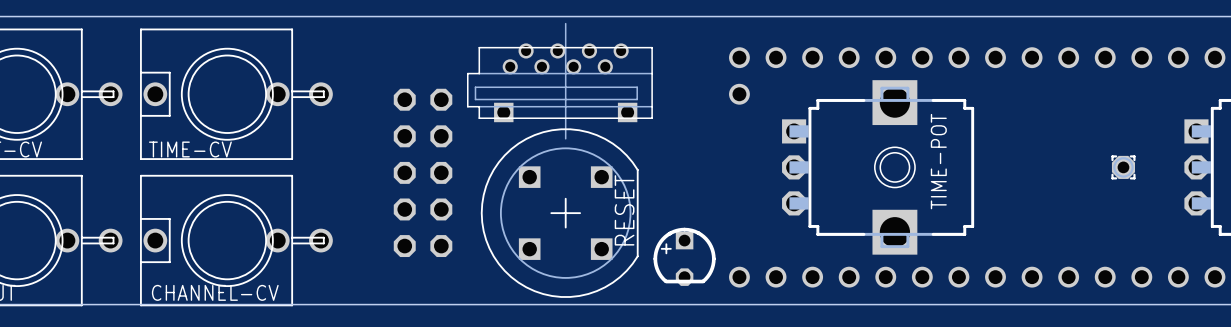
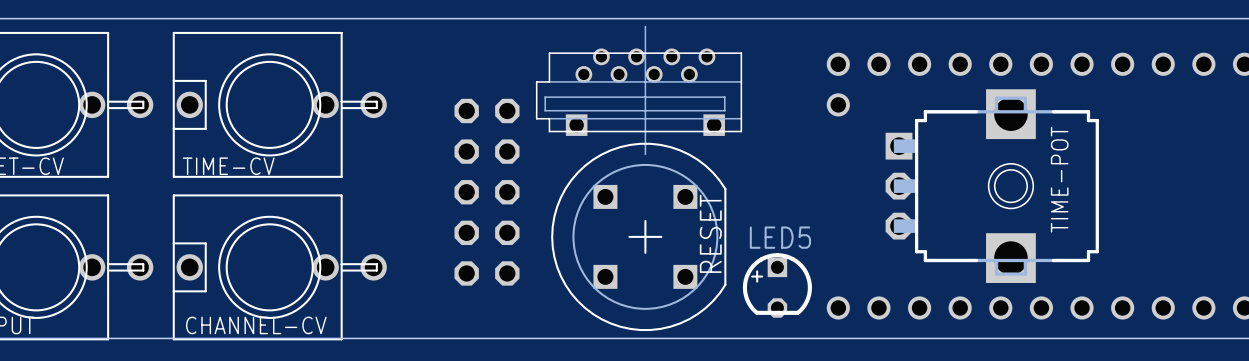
LED5 name: none -> LED5 (780, 237)

